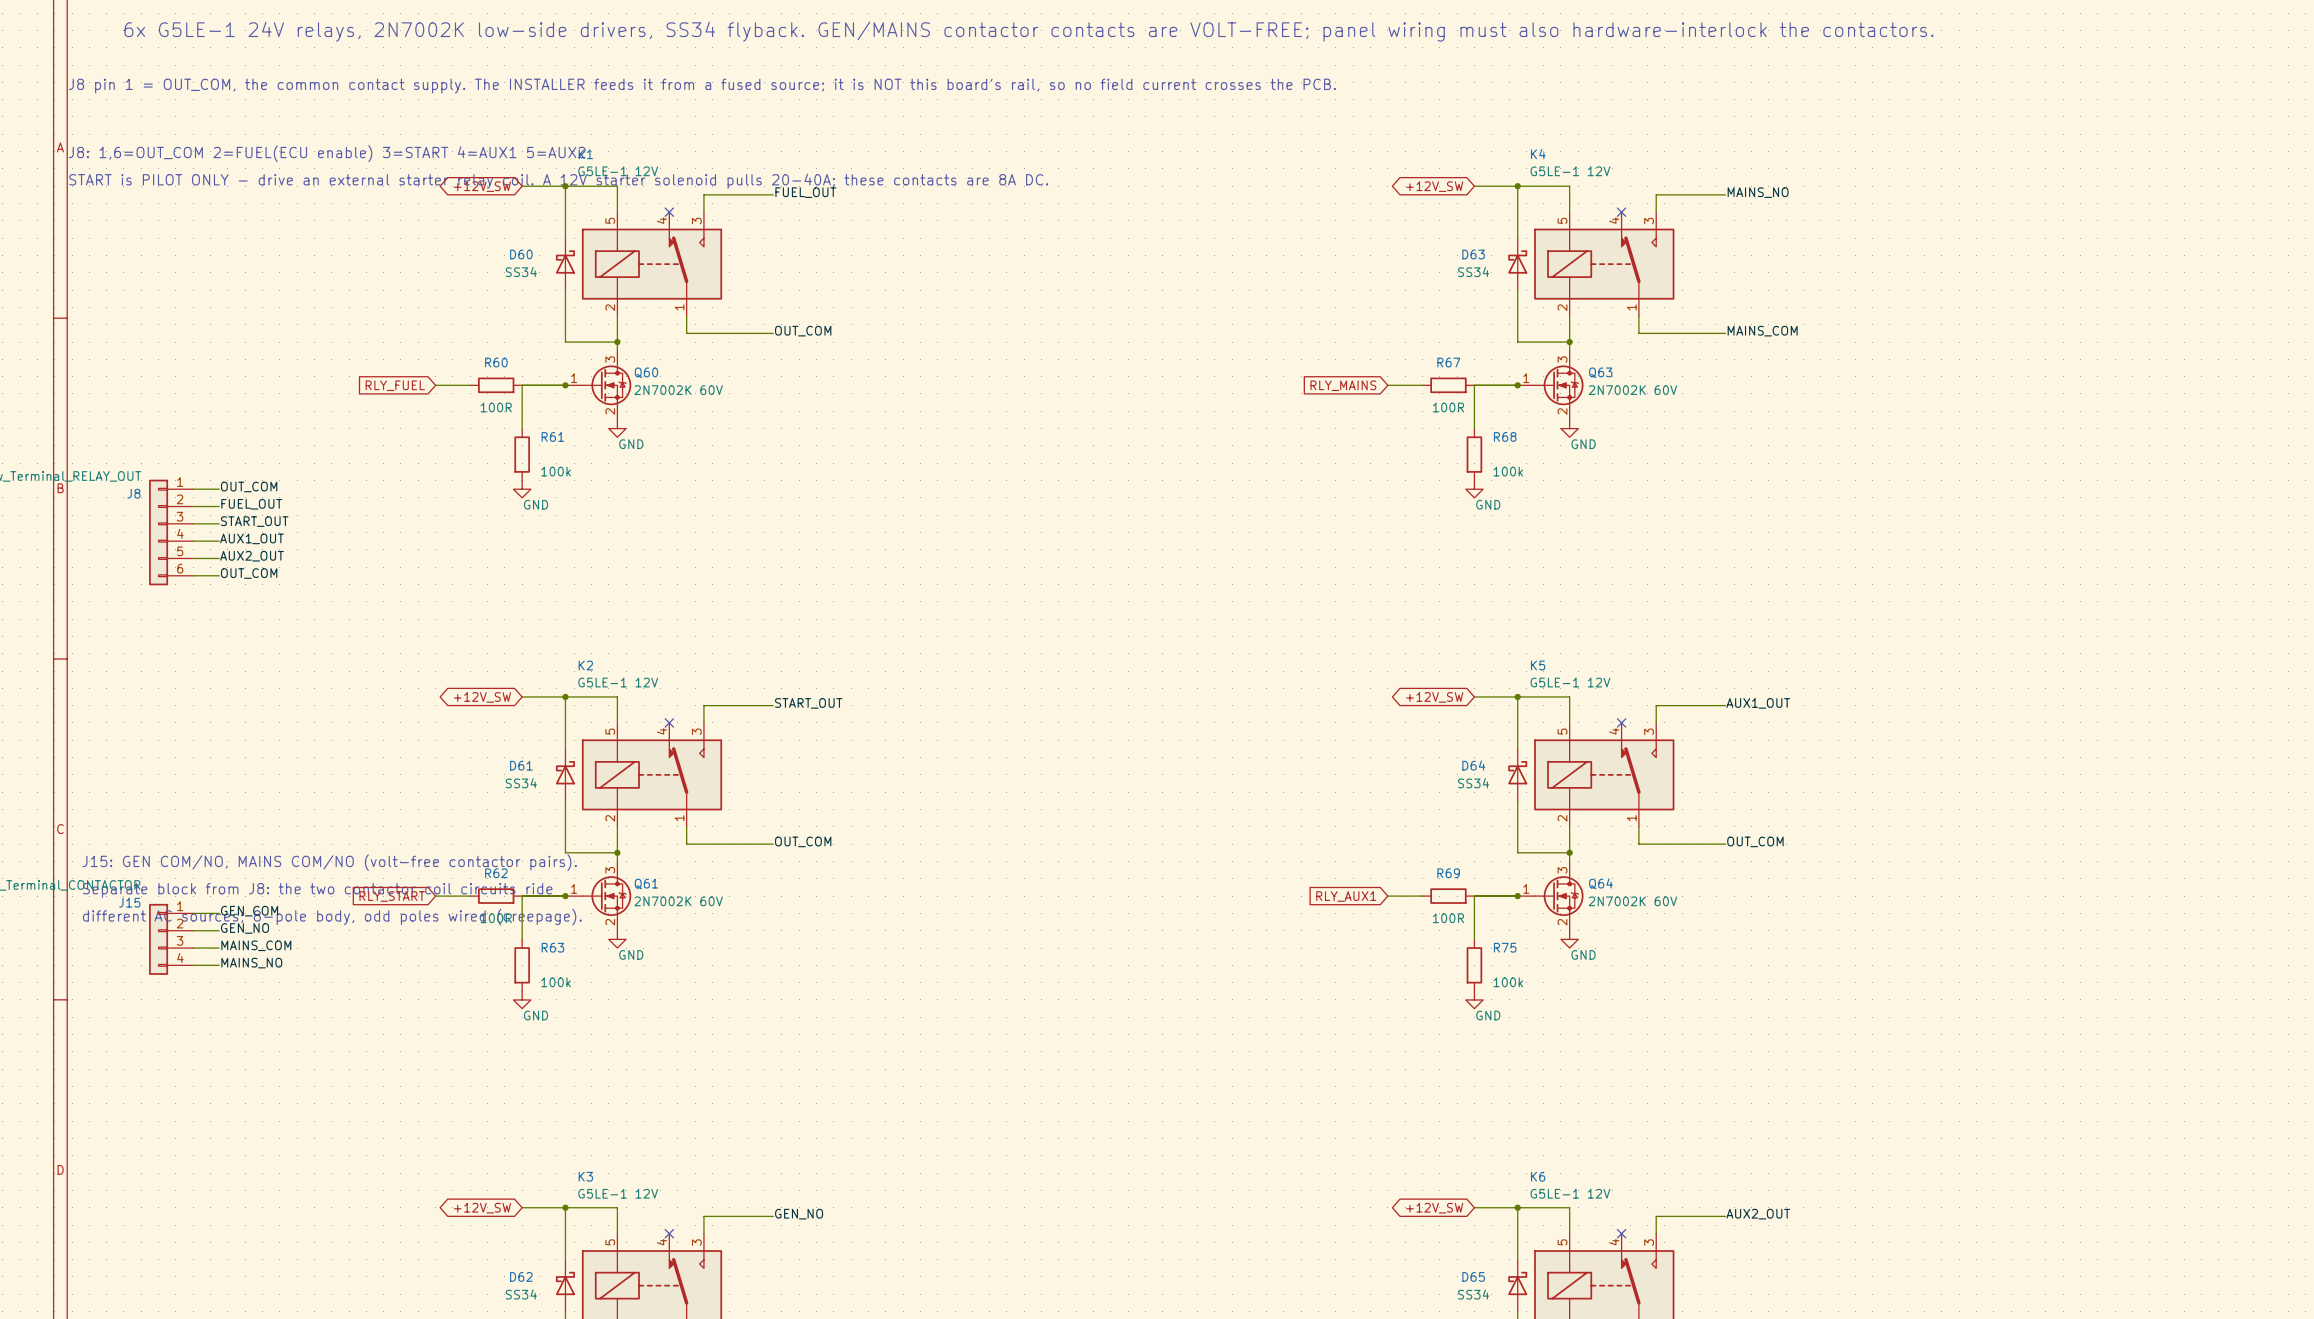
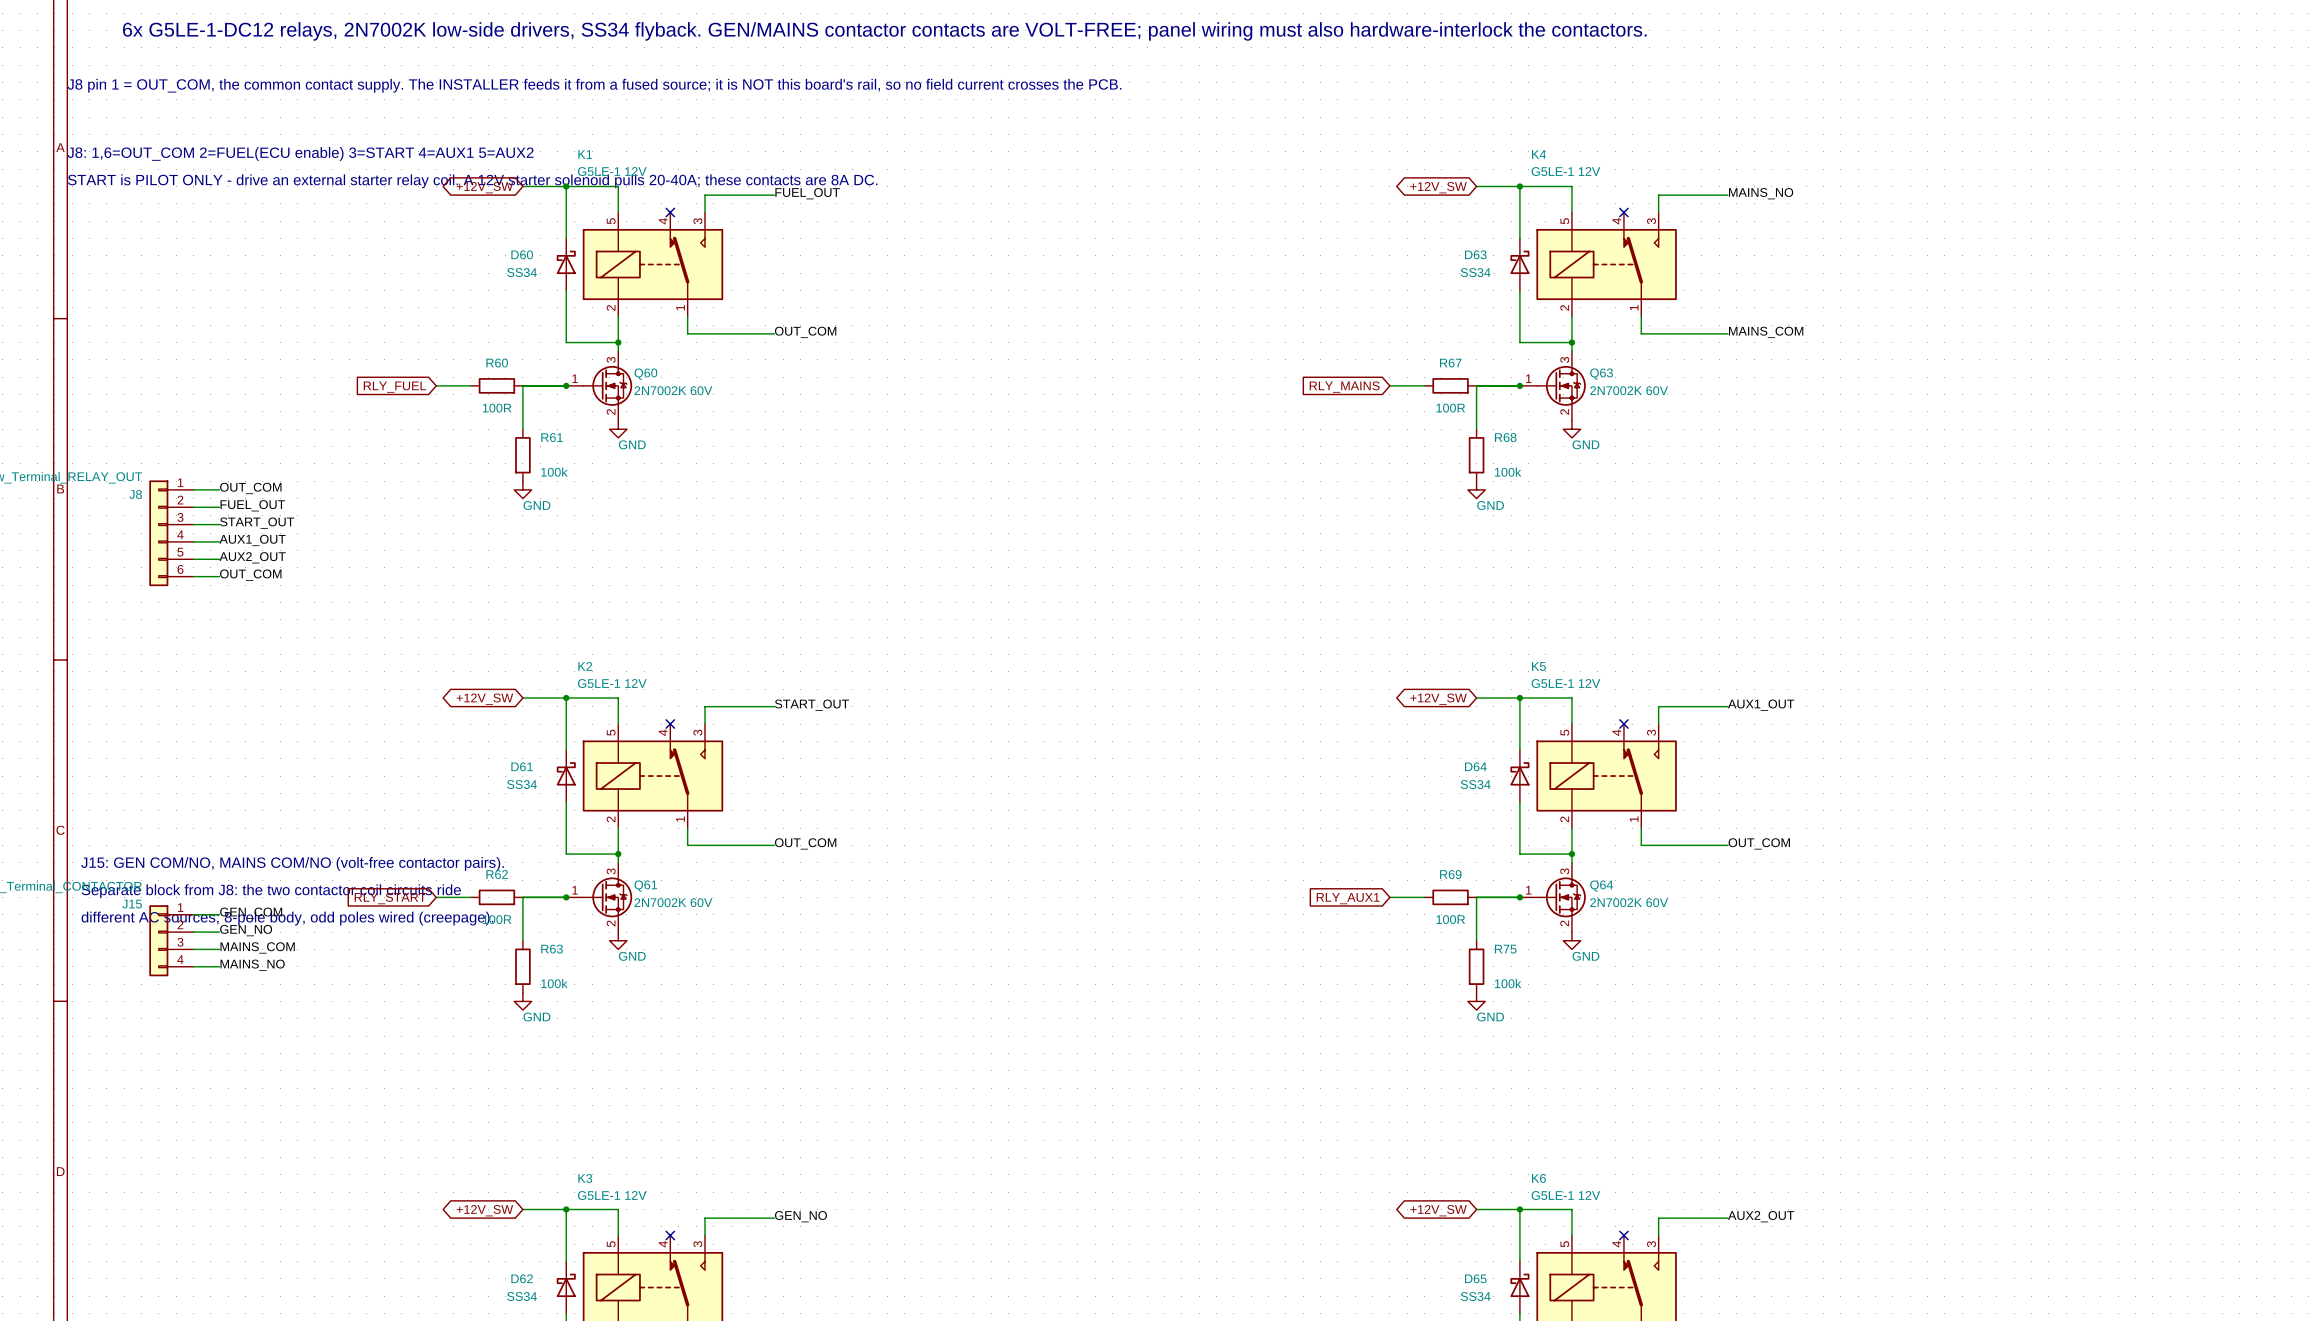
text: 6x G5LE-1 24V relays, 2N7002K low-side drivers, SS34 flyback. GEN/MAINS contactor contacts are VOLT-FREE; panel wiring must also hardware-interlock the contactors. (1029, 31) -> 6x G5LE-1-DC12 relays, 2N7002K low-side drivers, SS34 flyback. GEN/MAINS contactor contacts are VOLT-FREE; panel wiring must also hardware-interlock the contactors. (884, 31)

